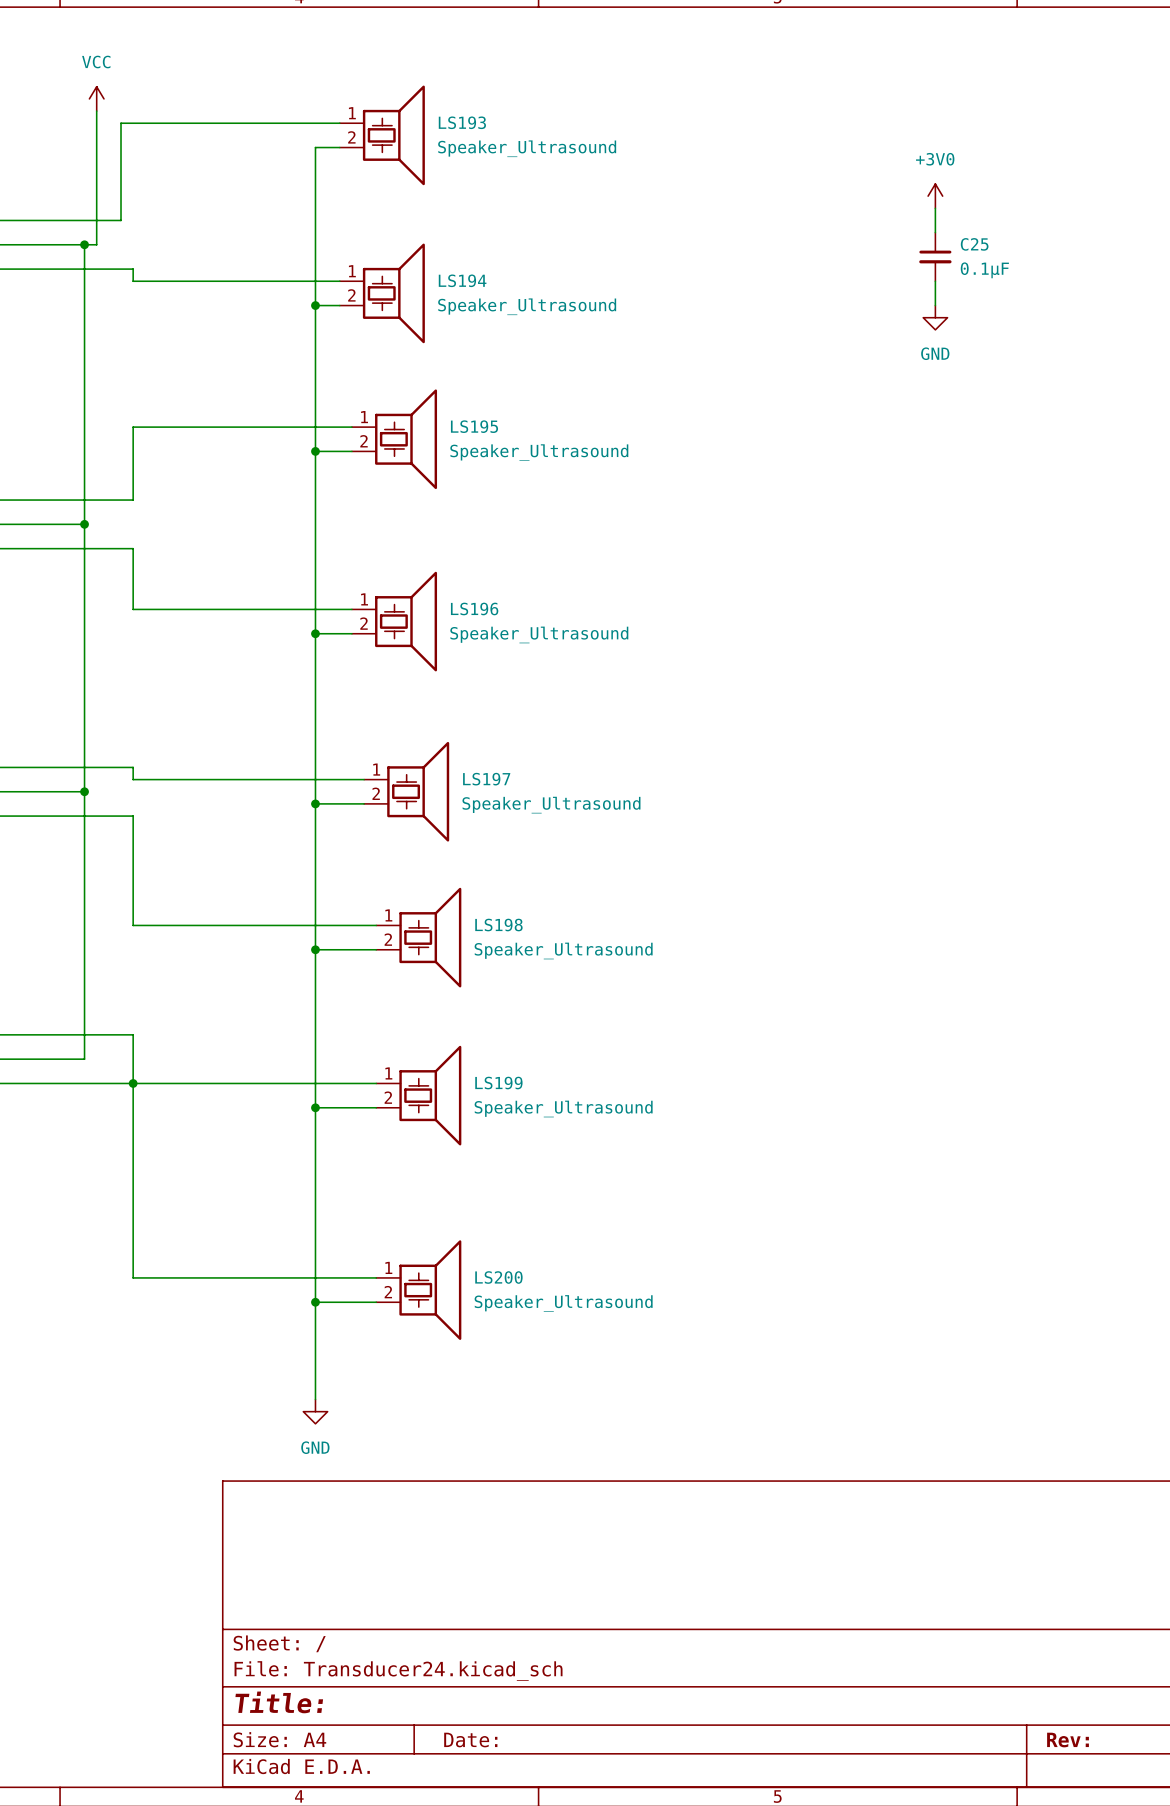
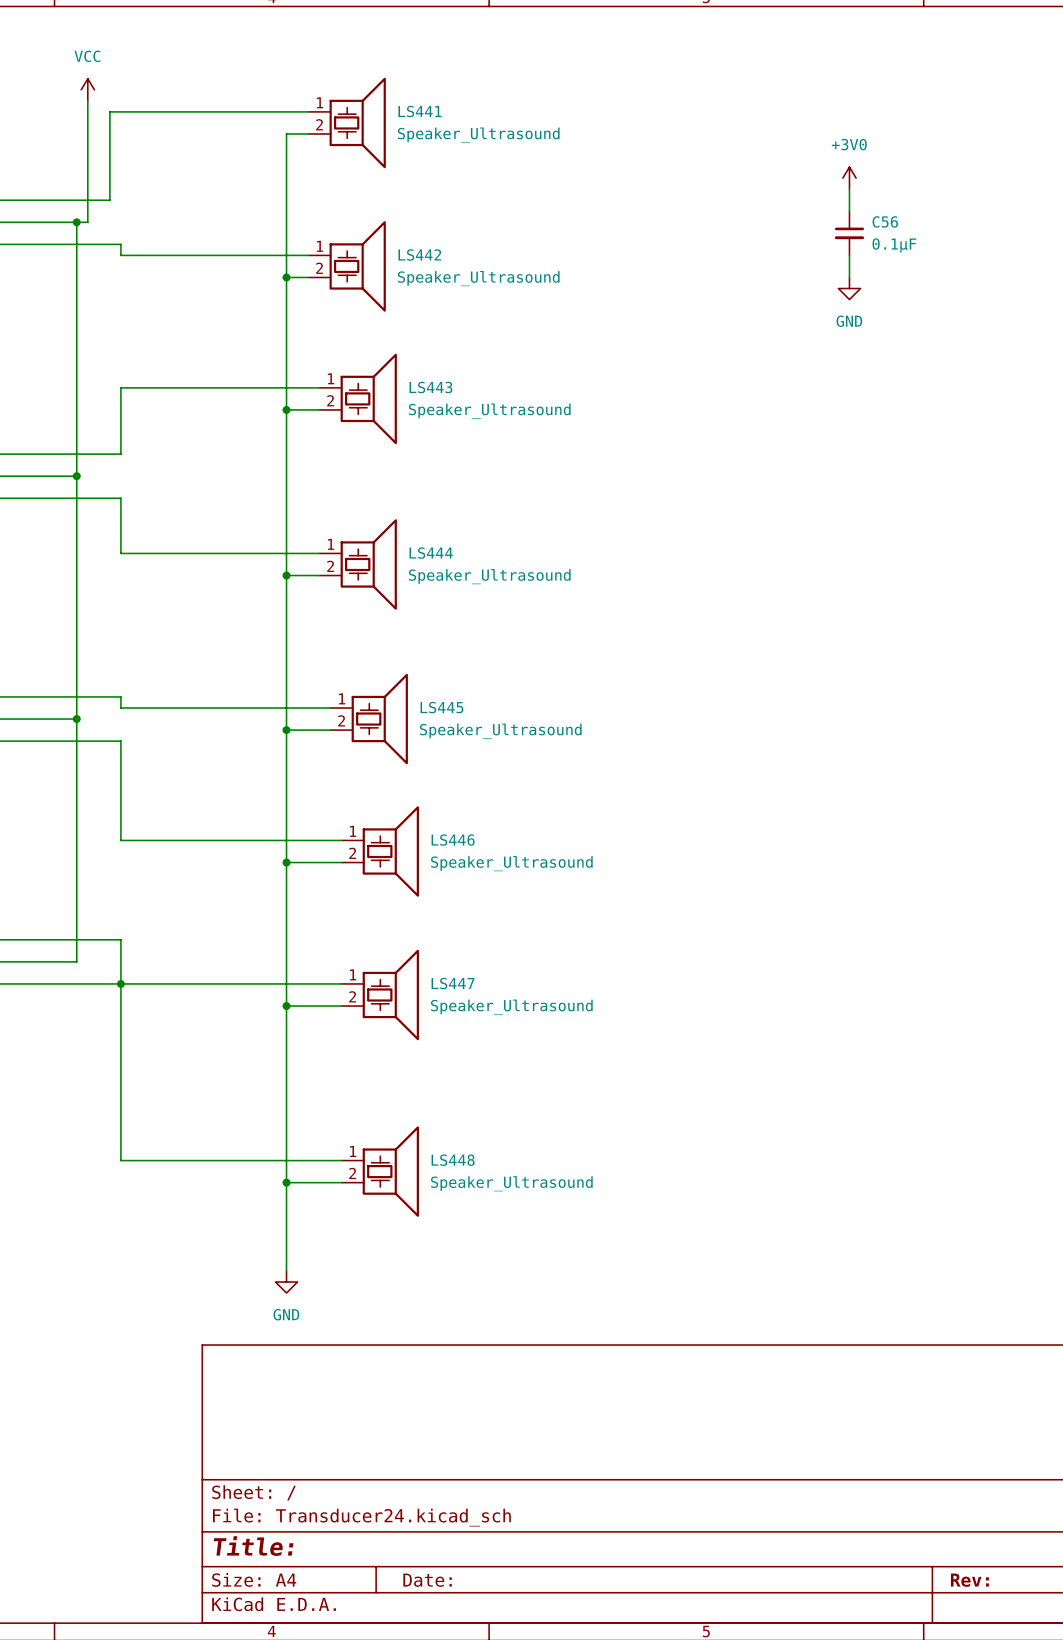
LS193 name: LS193 (462, 122) -> LS441 (419, 111)
C25 name: C25 (974, 244) -> C56 (885, 221)
LS194 name: LS194 (462, 280) -> LS442 (419, 255)
LS195 name: LS195 (474, 426) -> LS443 (430, 387)
LS196 name: LS196 (474, 608) -> LS444 (431, 553)
LS197 name: LS197 (486, 779) -> LS445 (441, 707)
LS198 name: LS198 (498, 925) -> LS446 (453, 840)
LS199 name: LS199 (498, 1083) -> LS447 (453, 983)
LS200 name: LS200 (498, 1277) -> LS448 (453, 1160)

